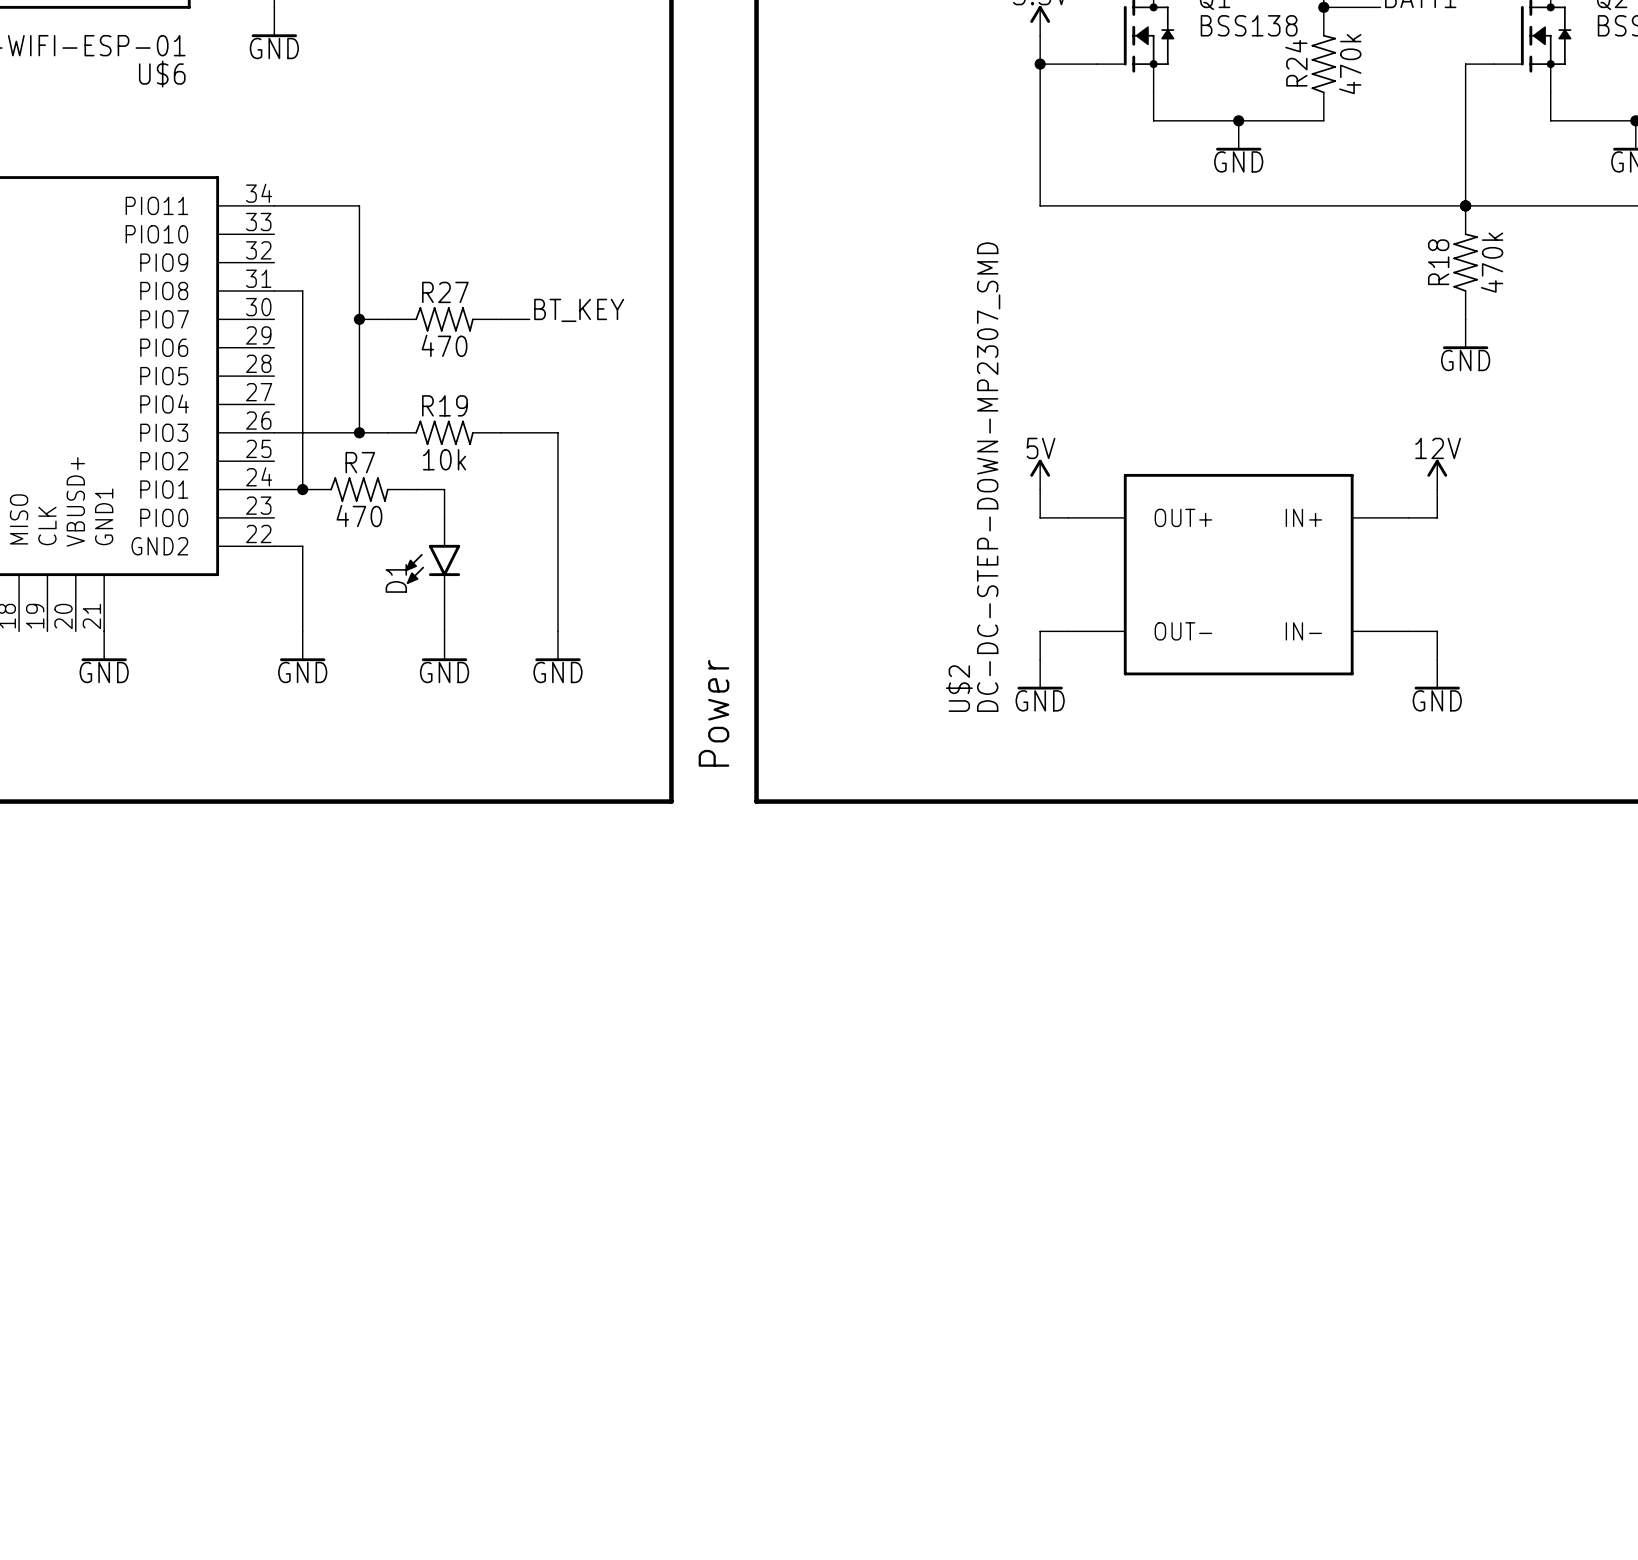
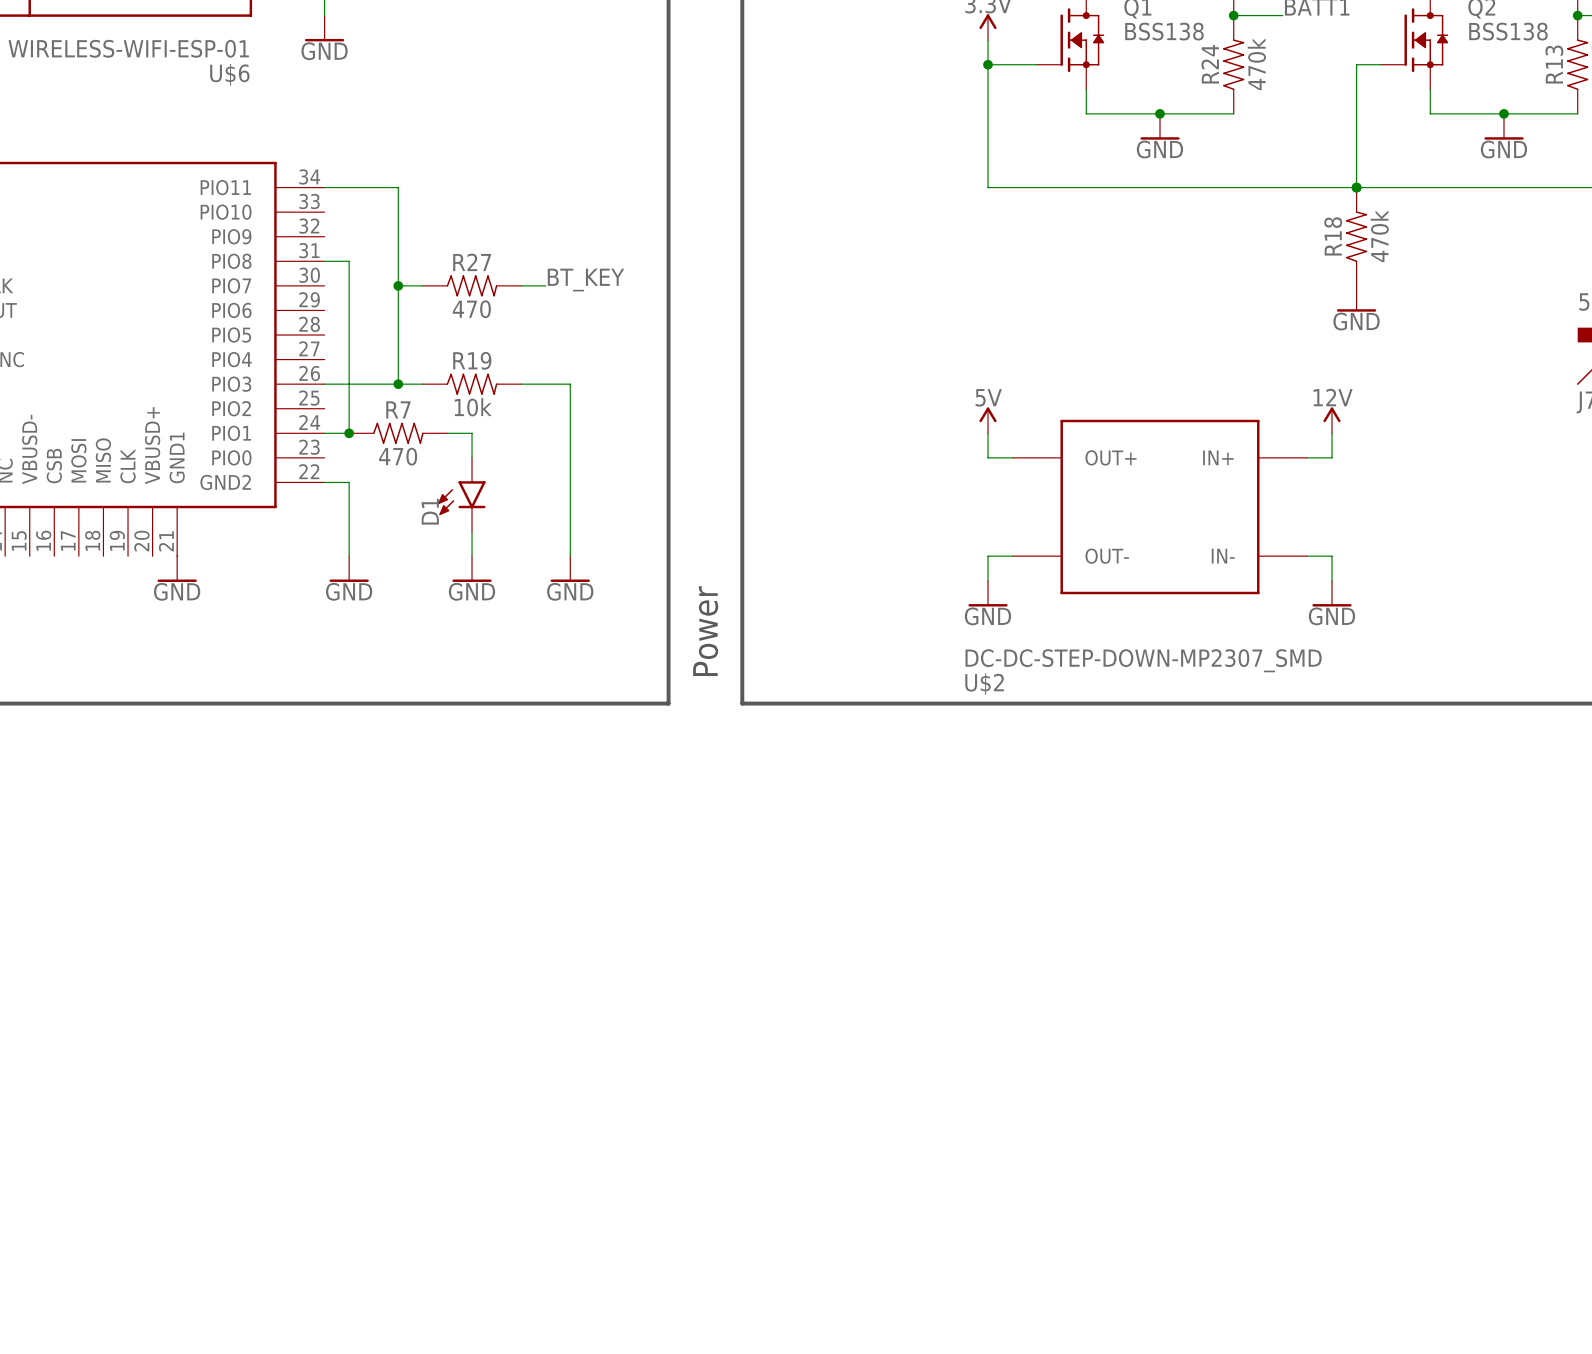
U$2 value rotation: 0° (988, 477) -> 90° clockwise (1143, 660)
U$2 name rotation: 0° (959, 688) -> 90° clockwise (984, 684)
U$2 name position: U$2 (959, 688) -> U$2 (984, 684)

